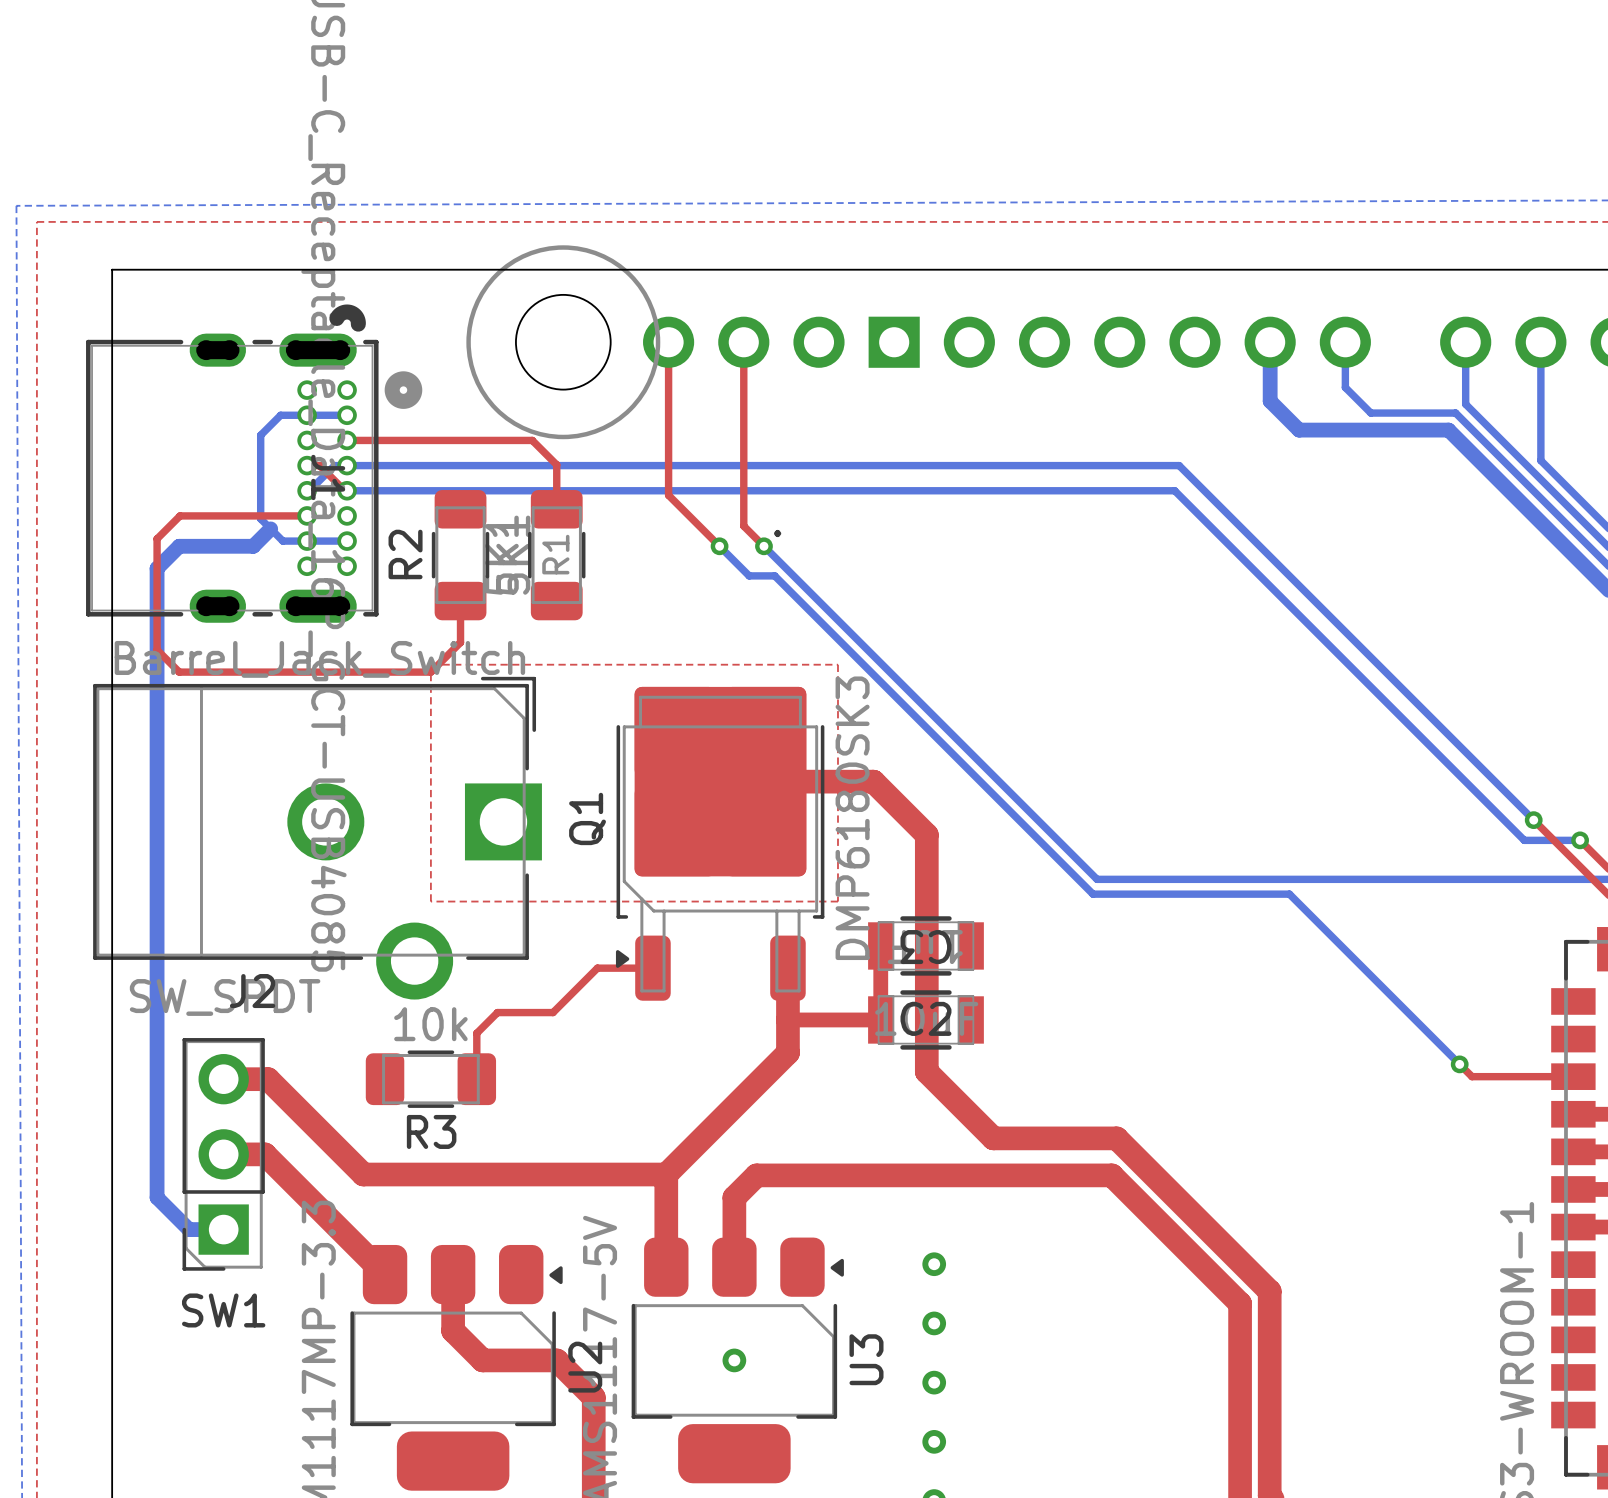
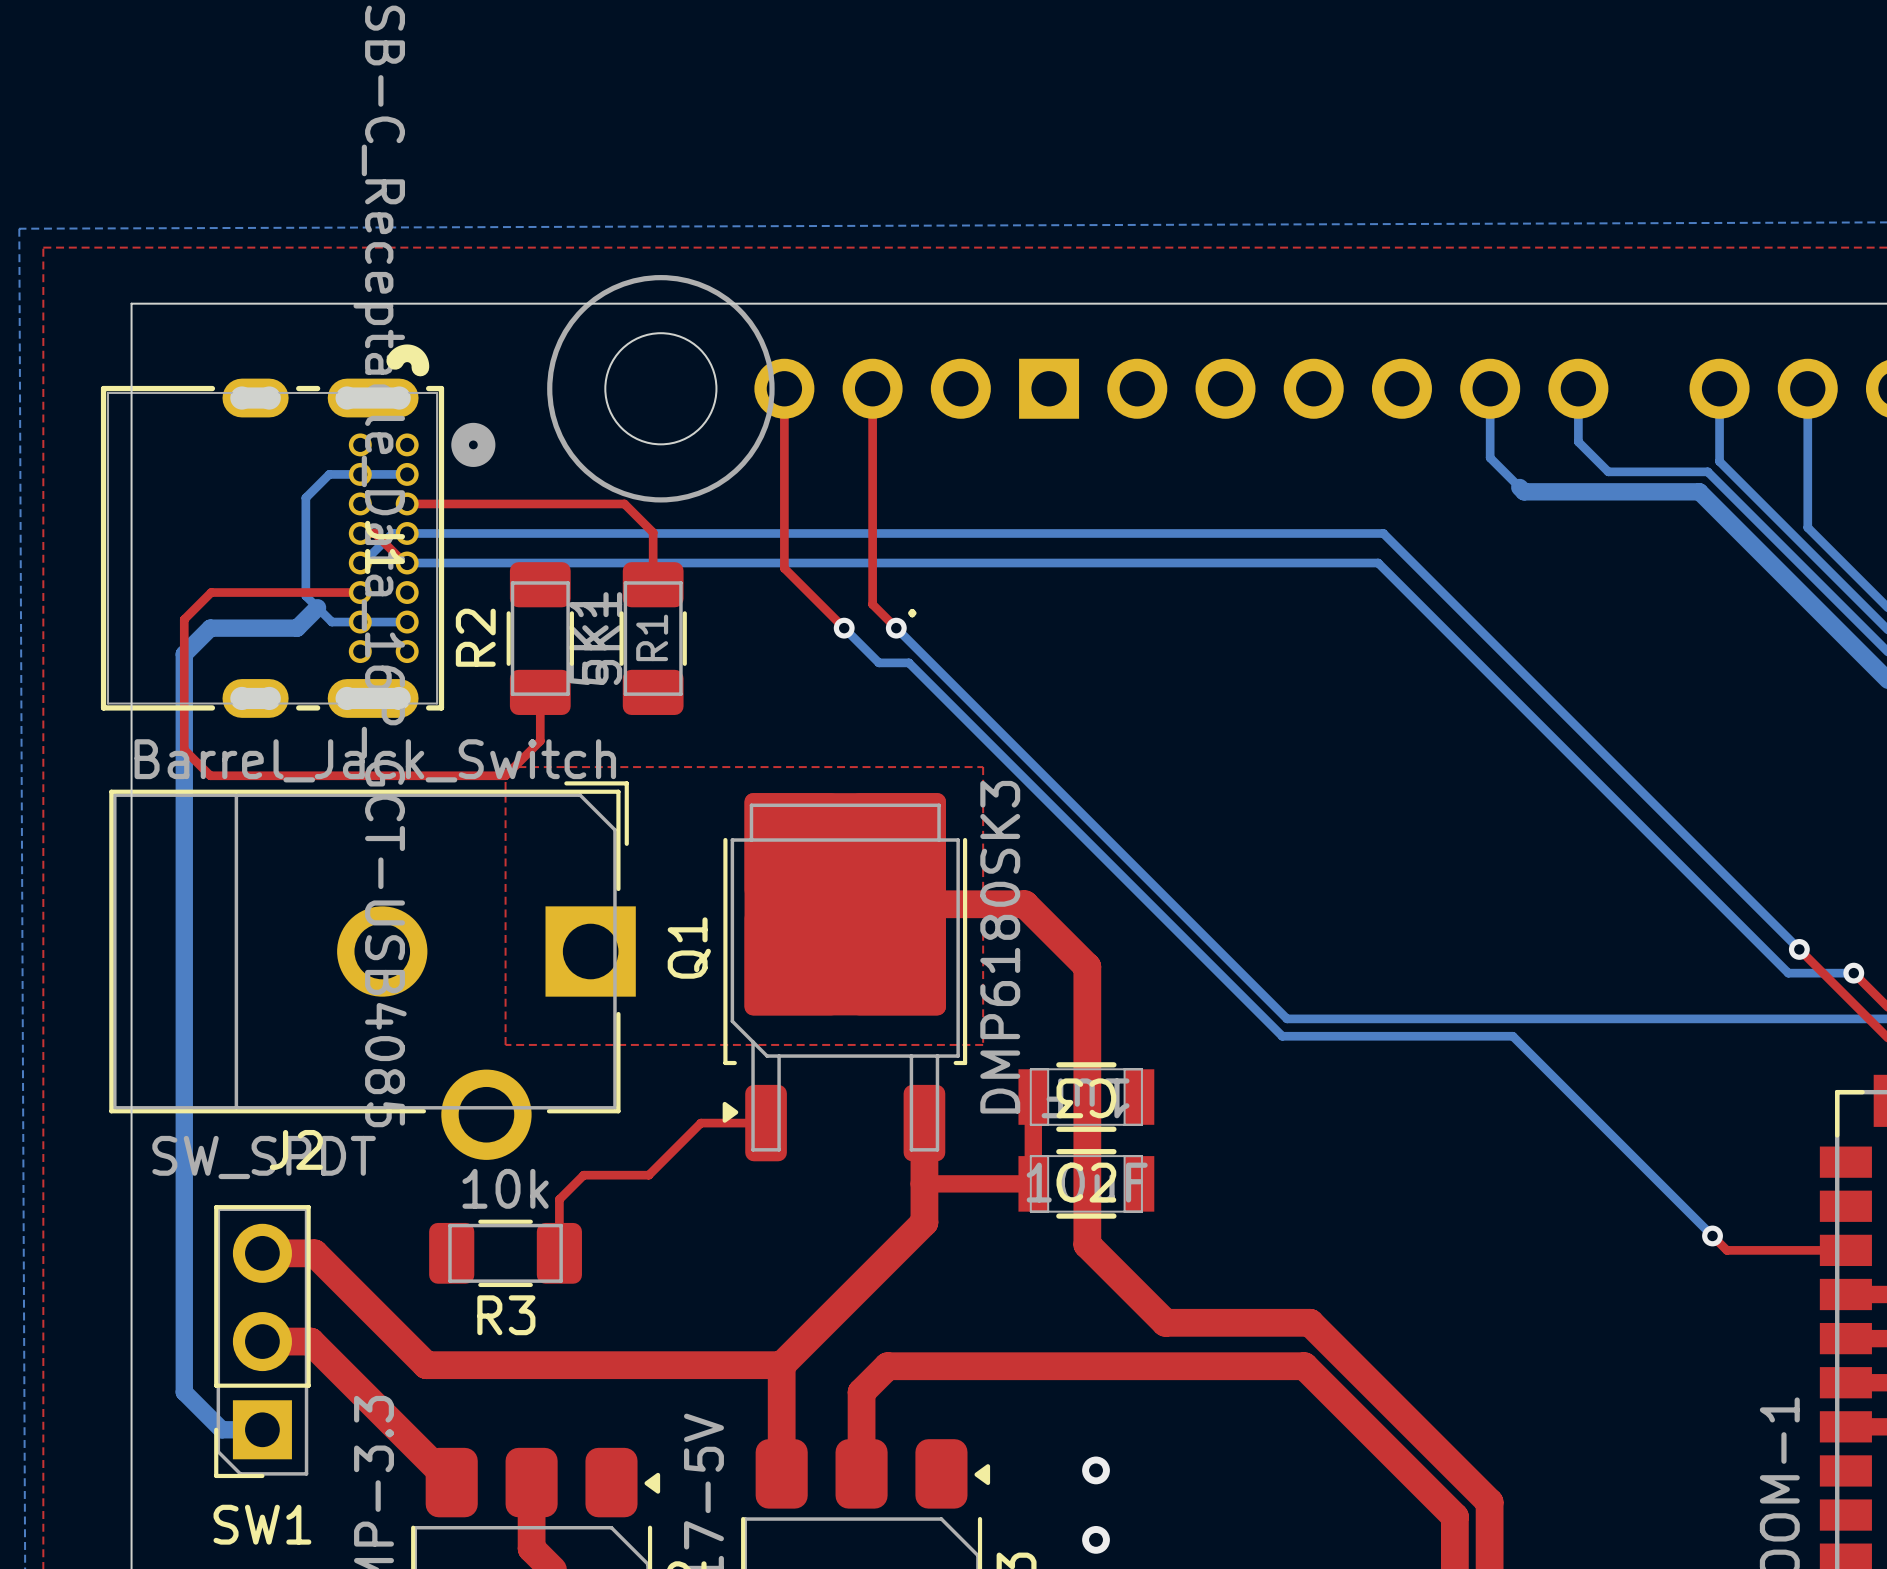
bottom track width: thick (1270, 342) (1270, 401) (1295, 426) -> thin (1490, 388) (1490, 457) (1519, 487)

